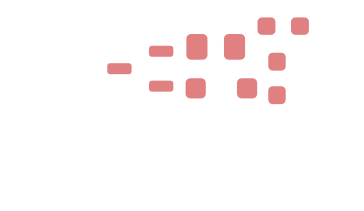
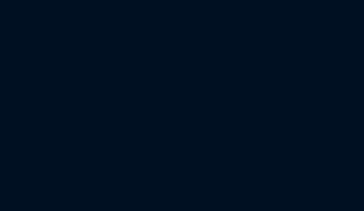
part: (283, 26) -> none
part: (215, 46) -> none
part: (140, 68) -> none
part: (276, 78) -> none
part: (221, 88) -> none

